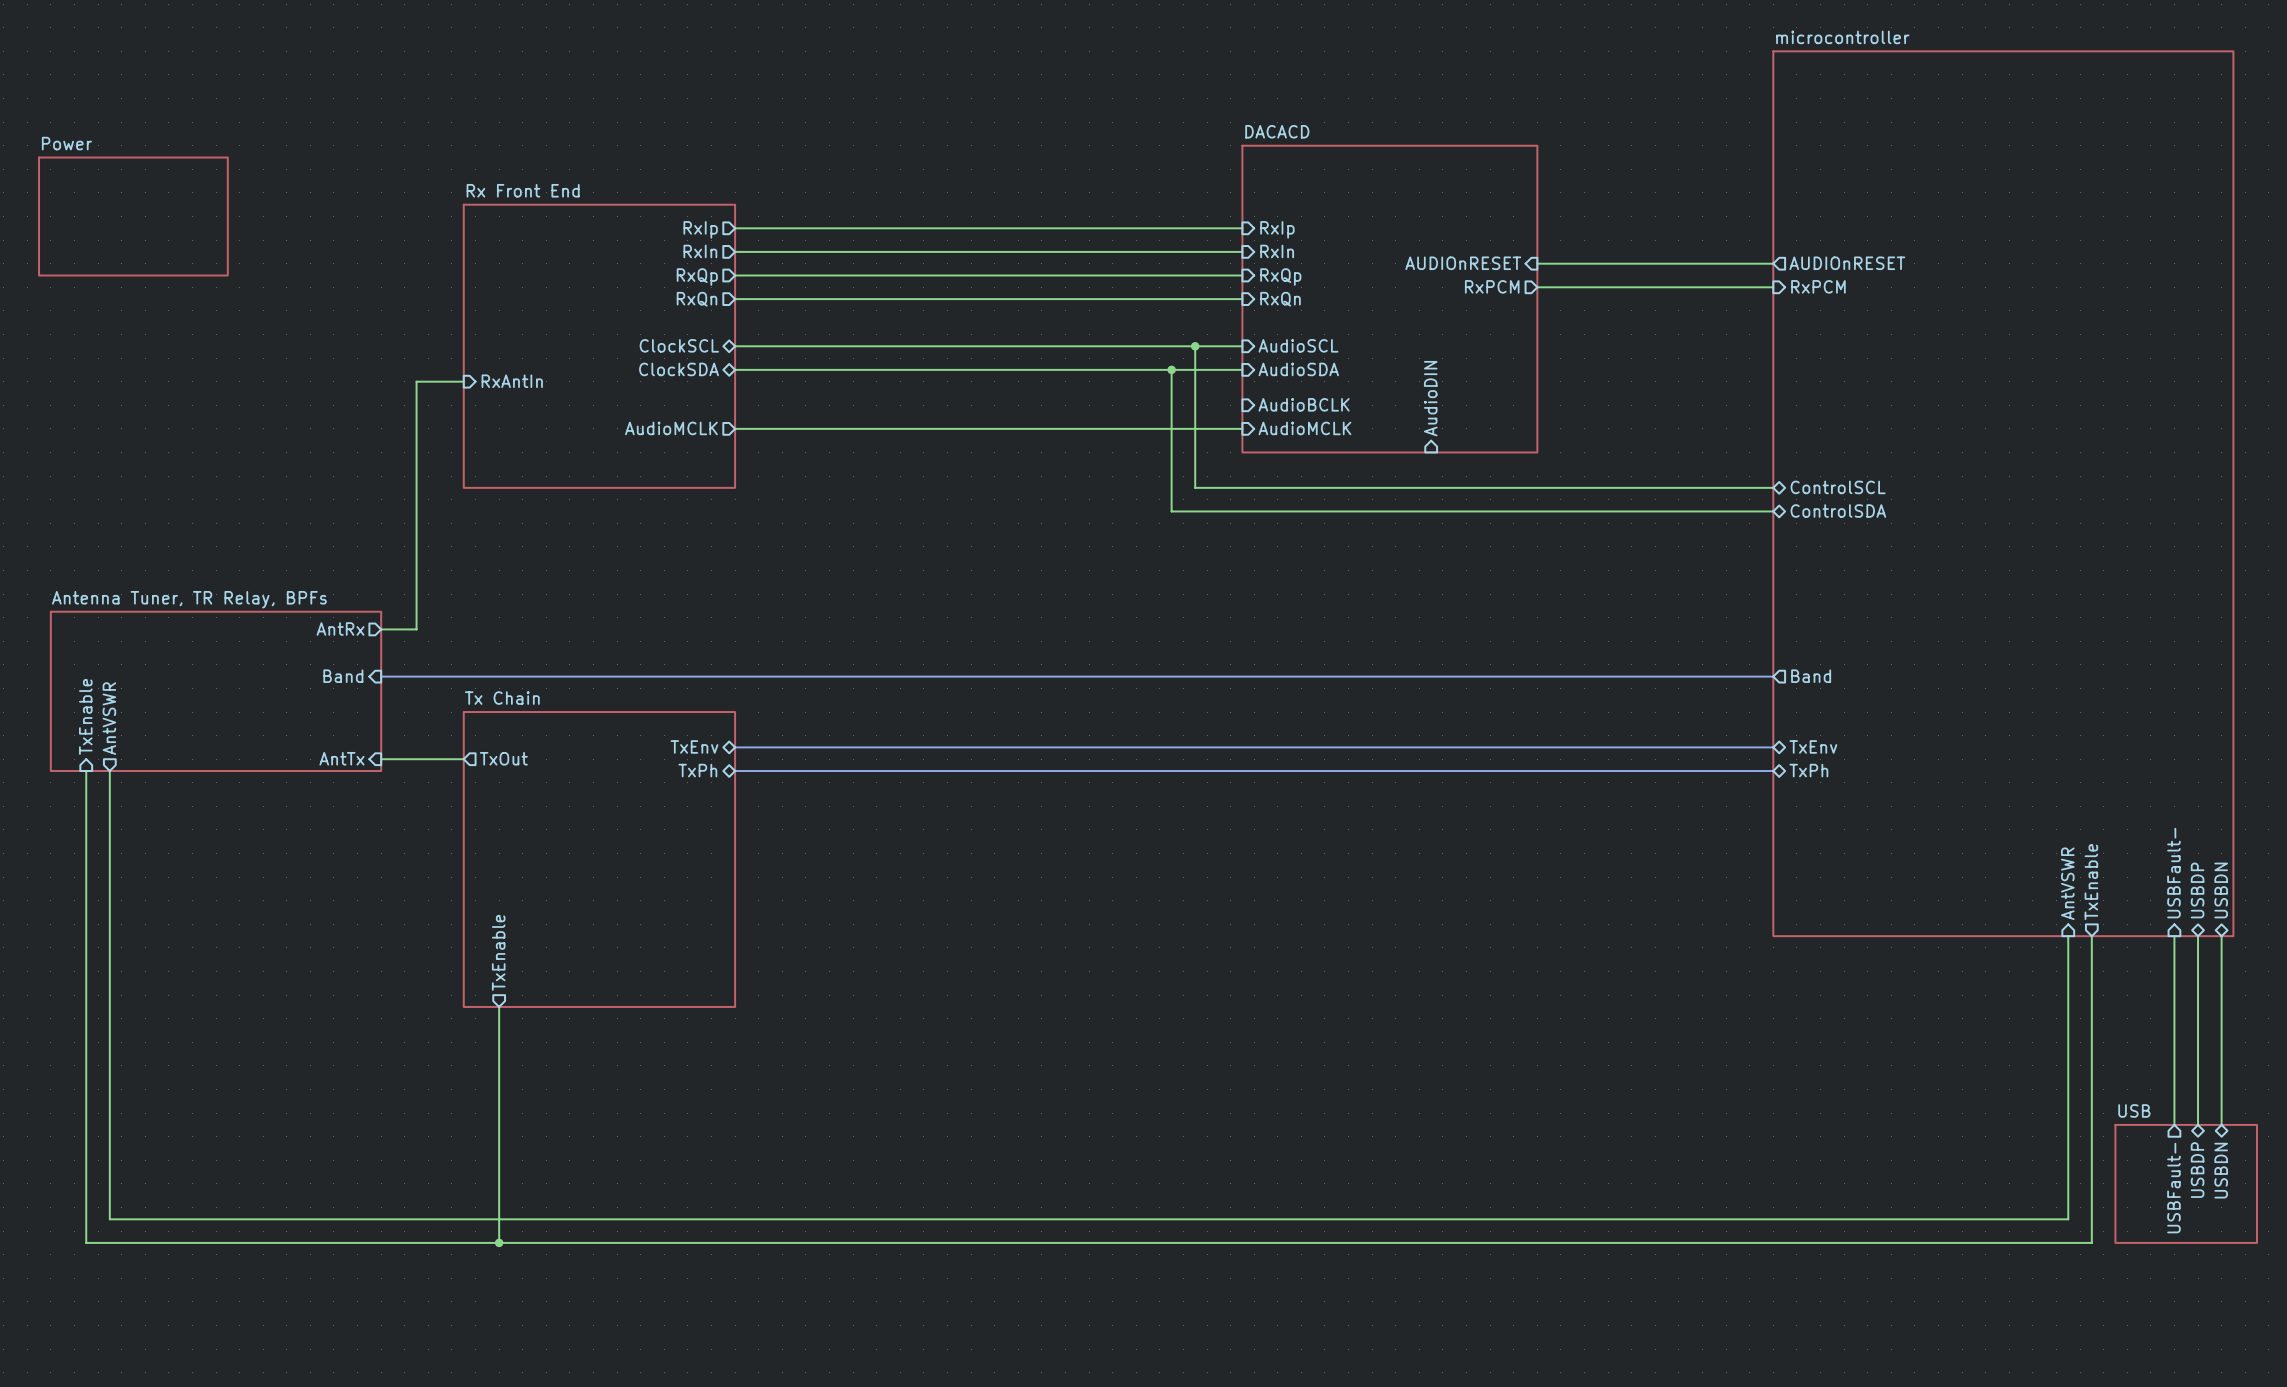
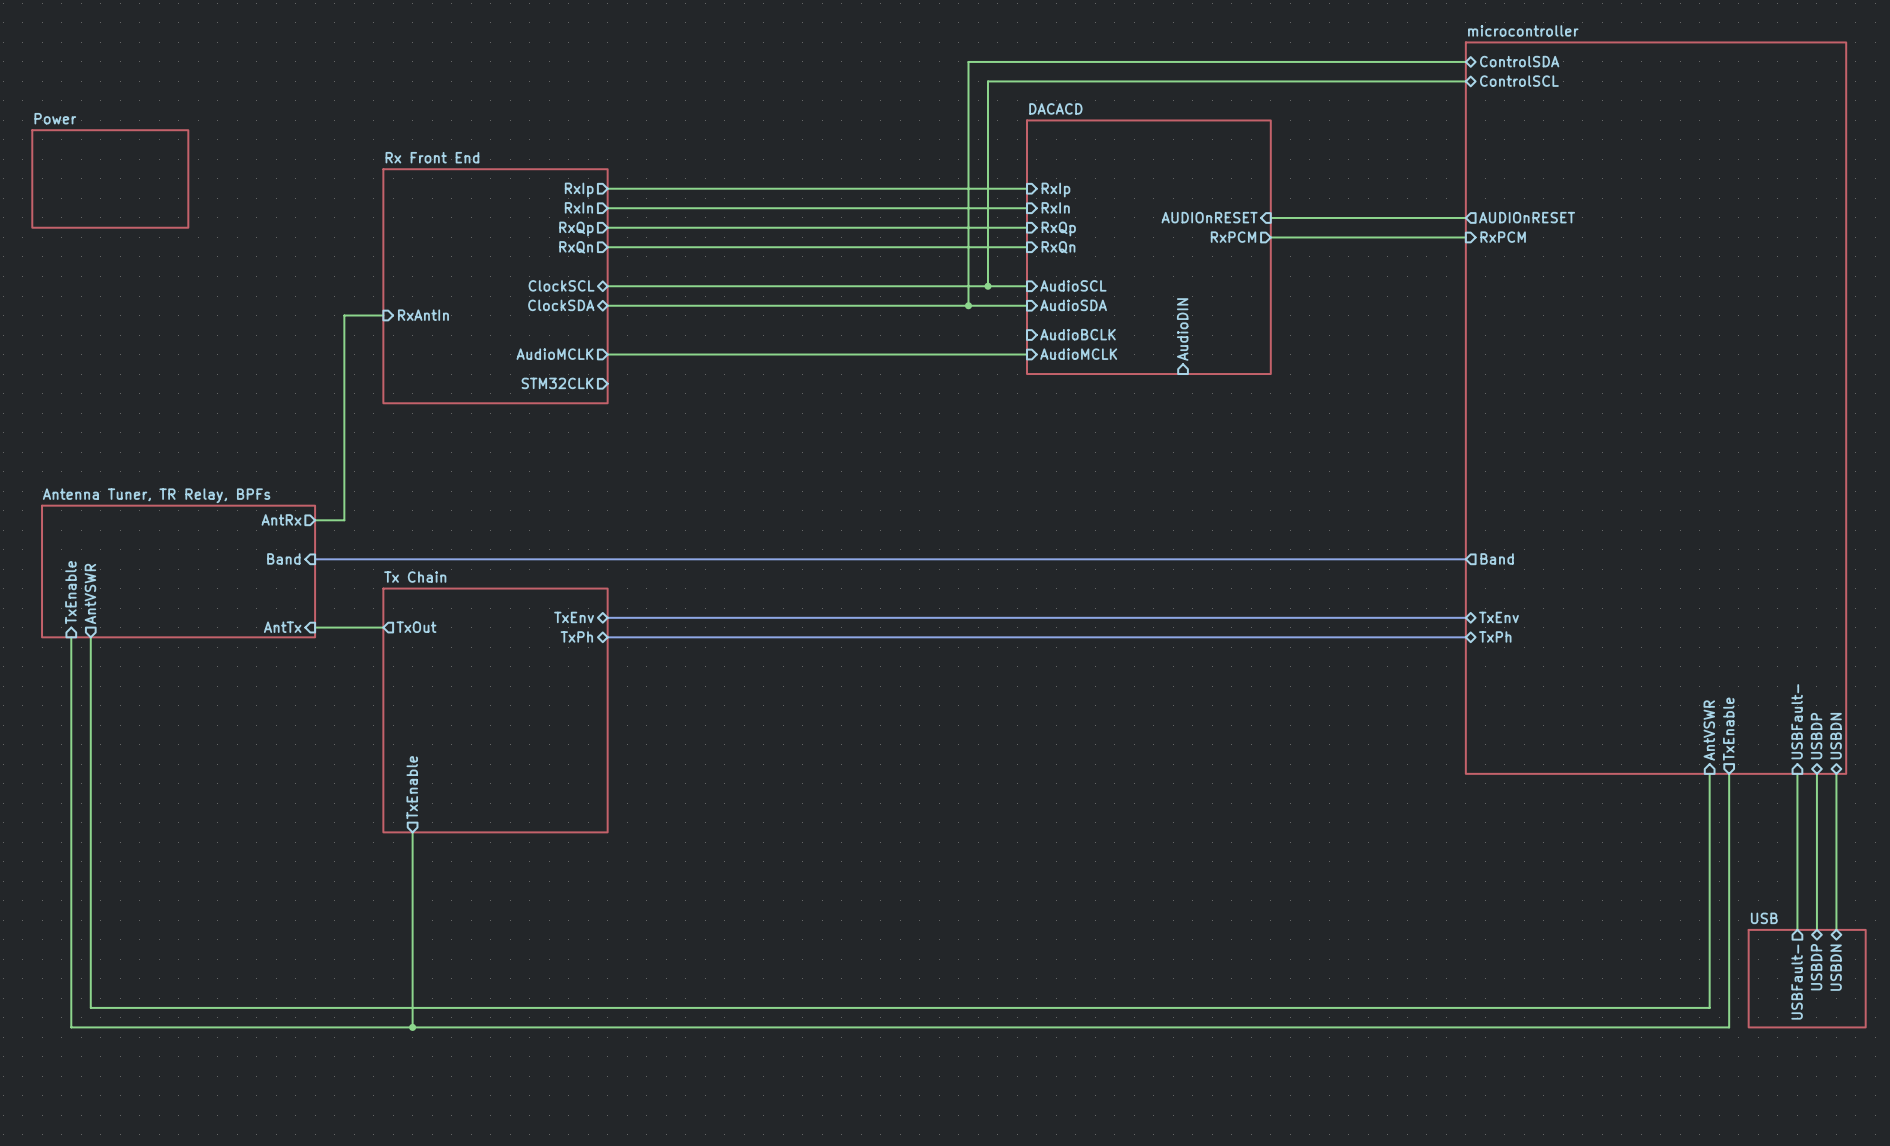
sheet pin: none -> ControlSDA (1519, 61)
sheet pin: none -> ControlSCL (1519, 81)
wire: (1195, 346) (1195, 487) (1773, 487) -> (987, 286) (987, 81) (1465, 81)
wire: (1171, 369) (1171, 511) (1773, 511) -> (968, 305) (968, 61) (1465, 61)
sheet pin: none -> STM32CLK (557, 383)
sheet pin: ControlSCL (1838, 487) -> none
sheet pin: ControlSDA (1838, 511) -> none

